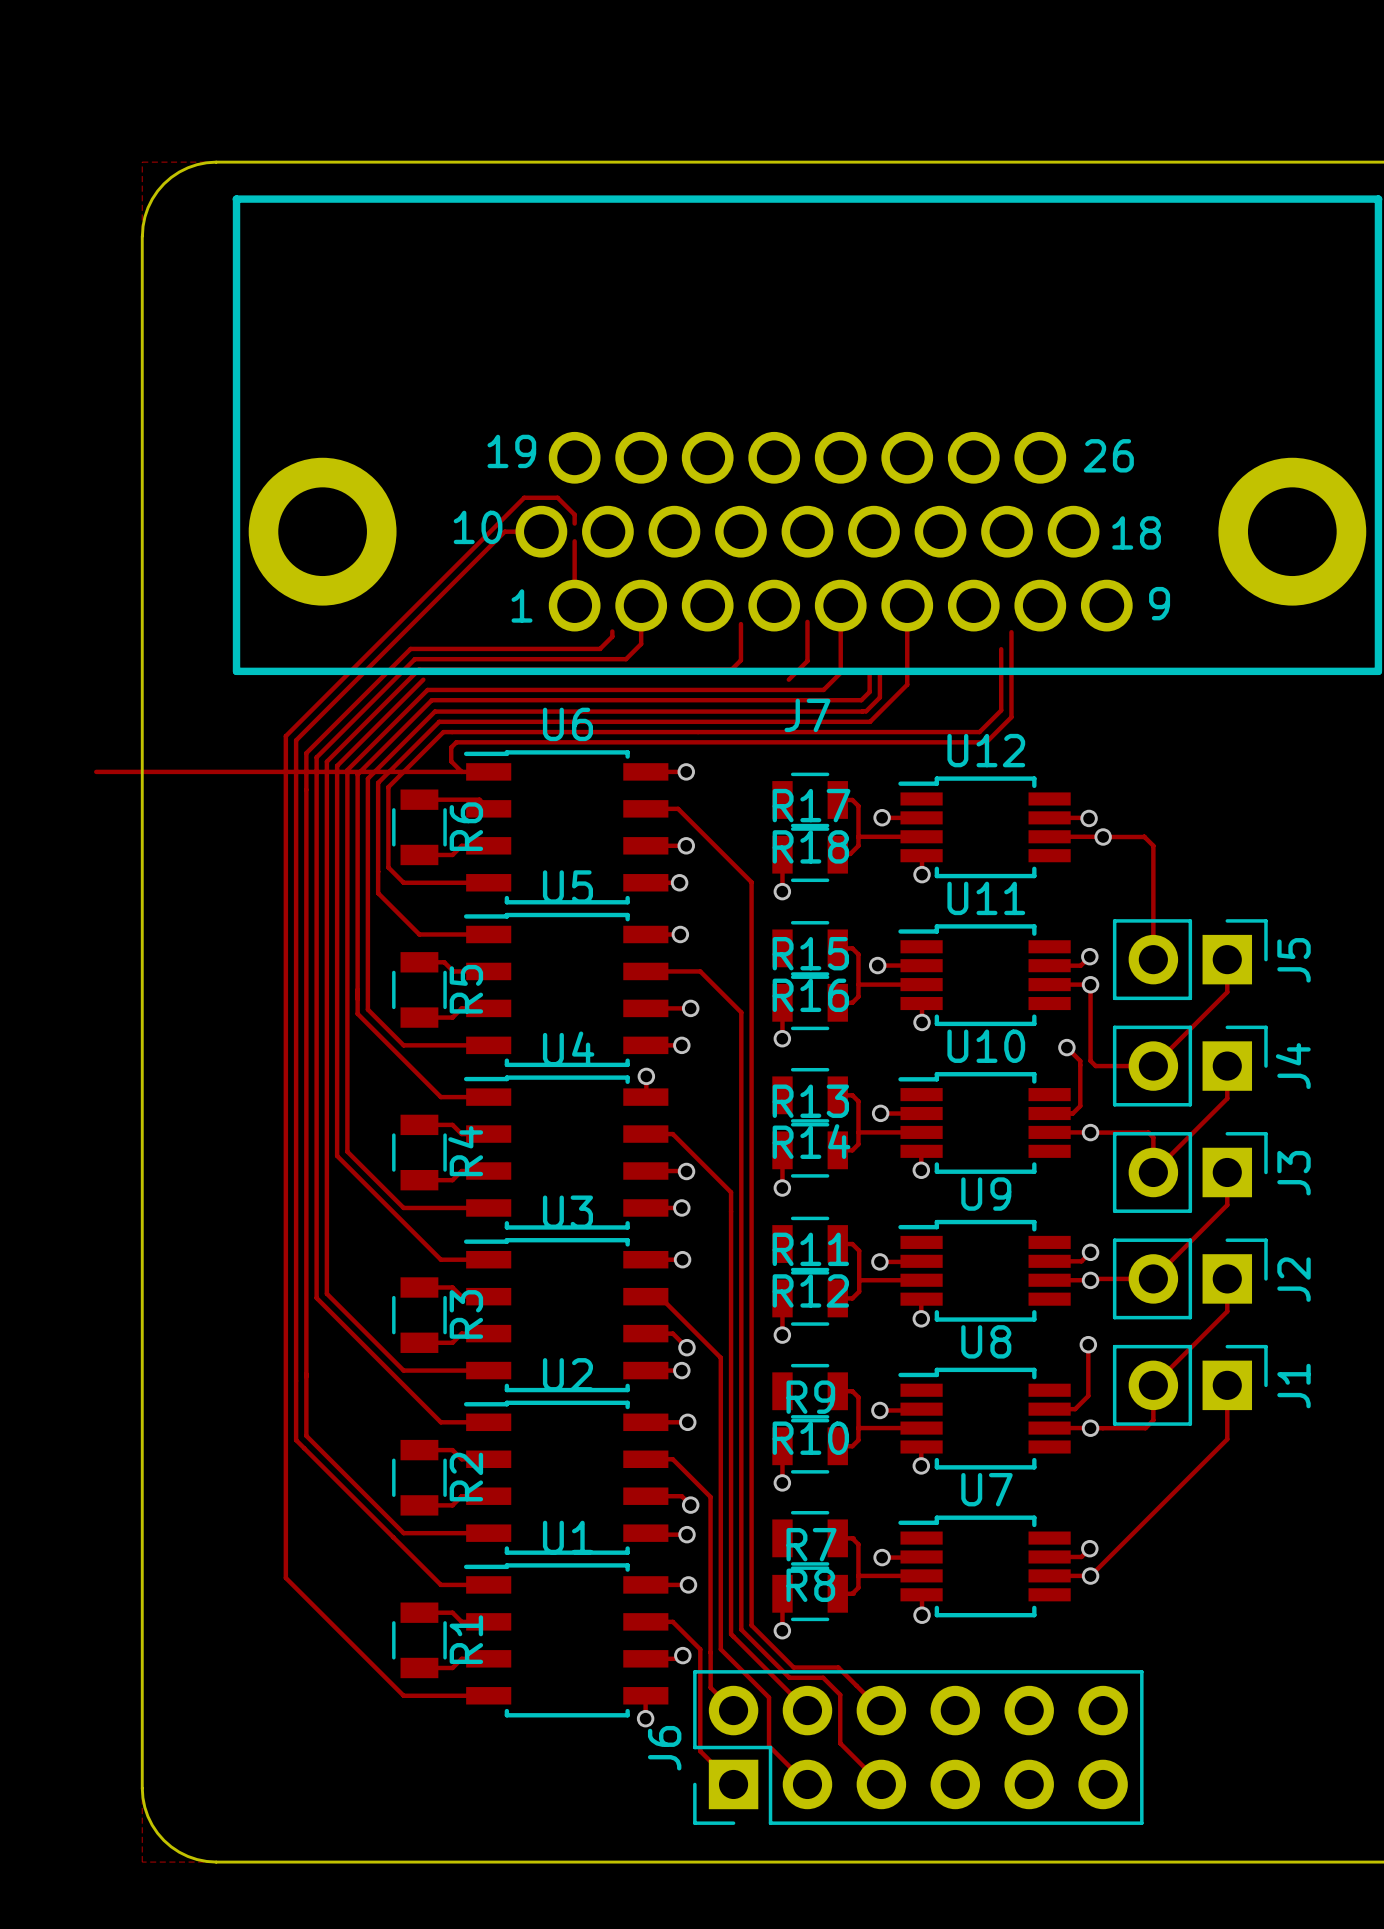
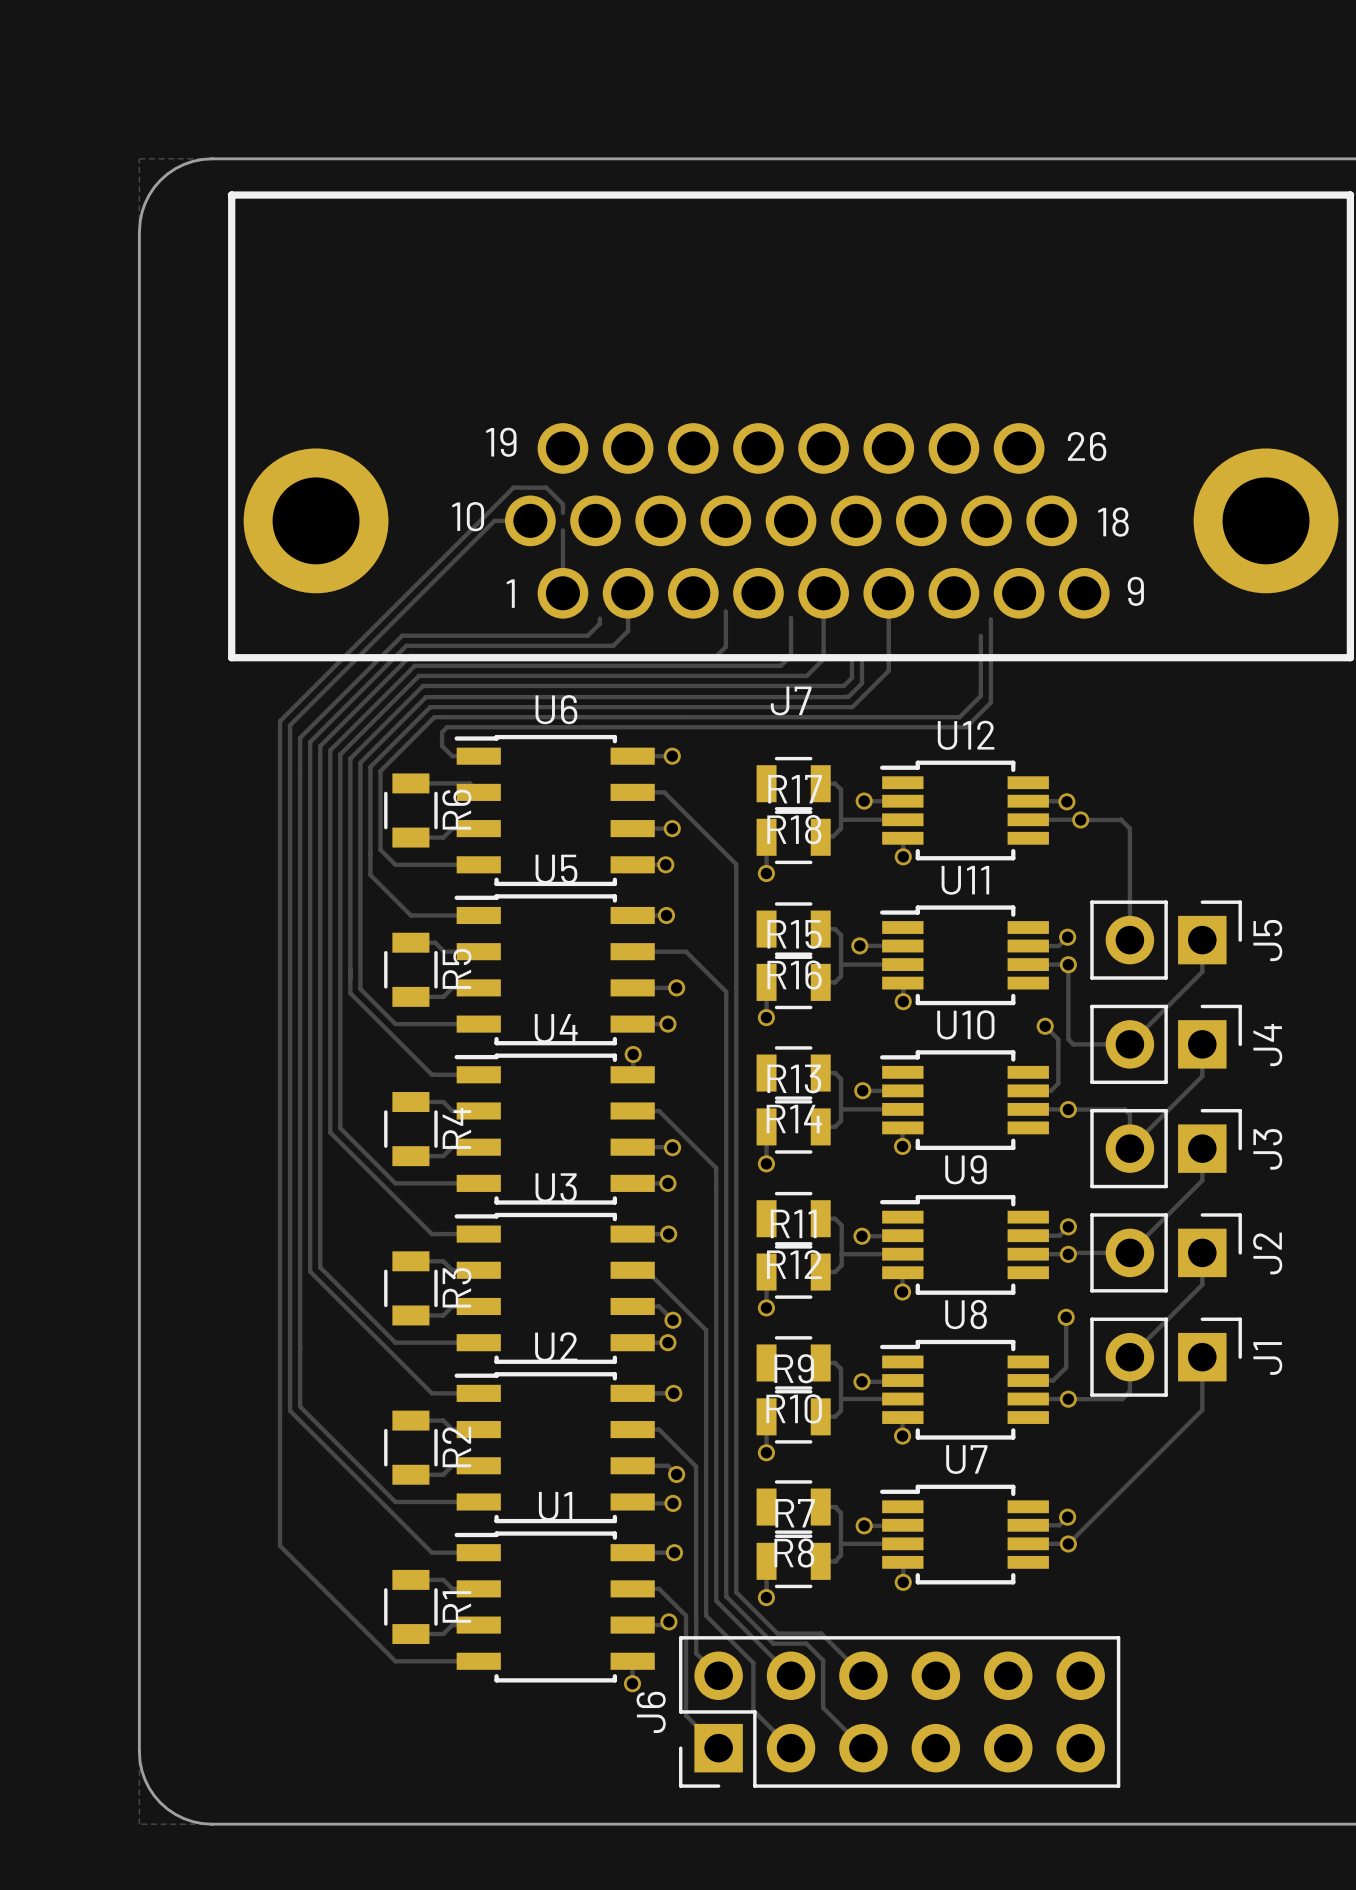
track: (807, 621) (807, 630) -> none
track: (807, 661) (788, 679) -> (791, 647) (791, 655) (780, 665) (414, 665)
track: (96, 771) (461, 771) -> none

